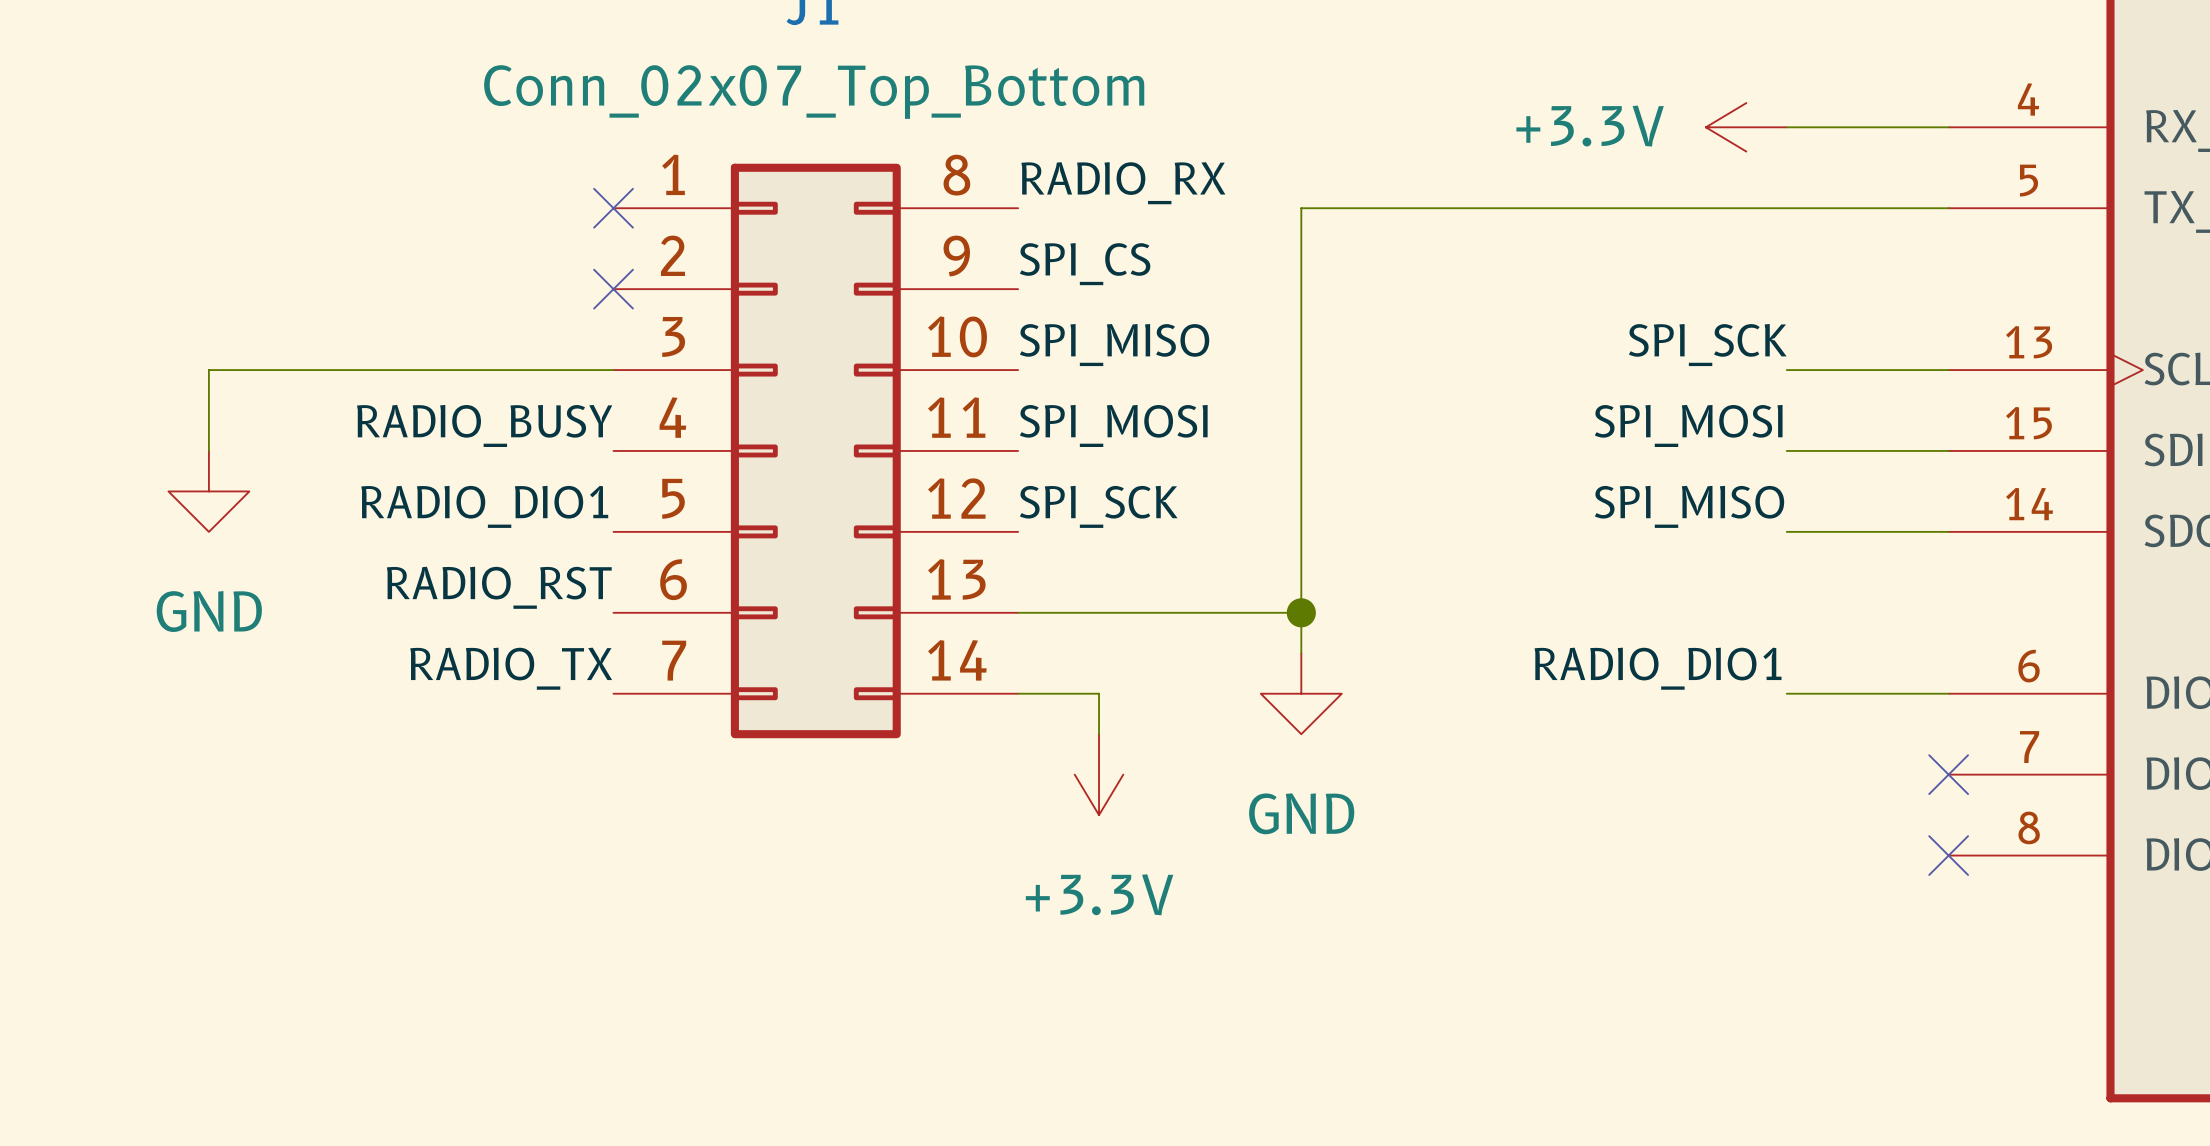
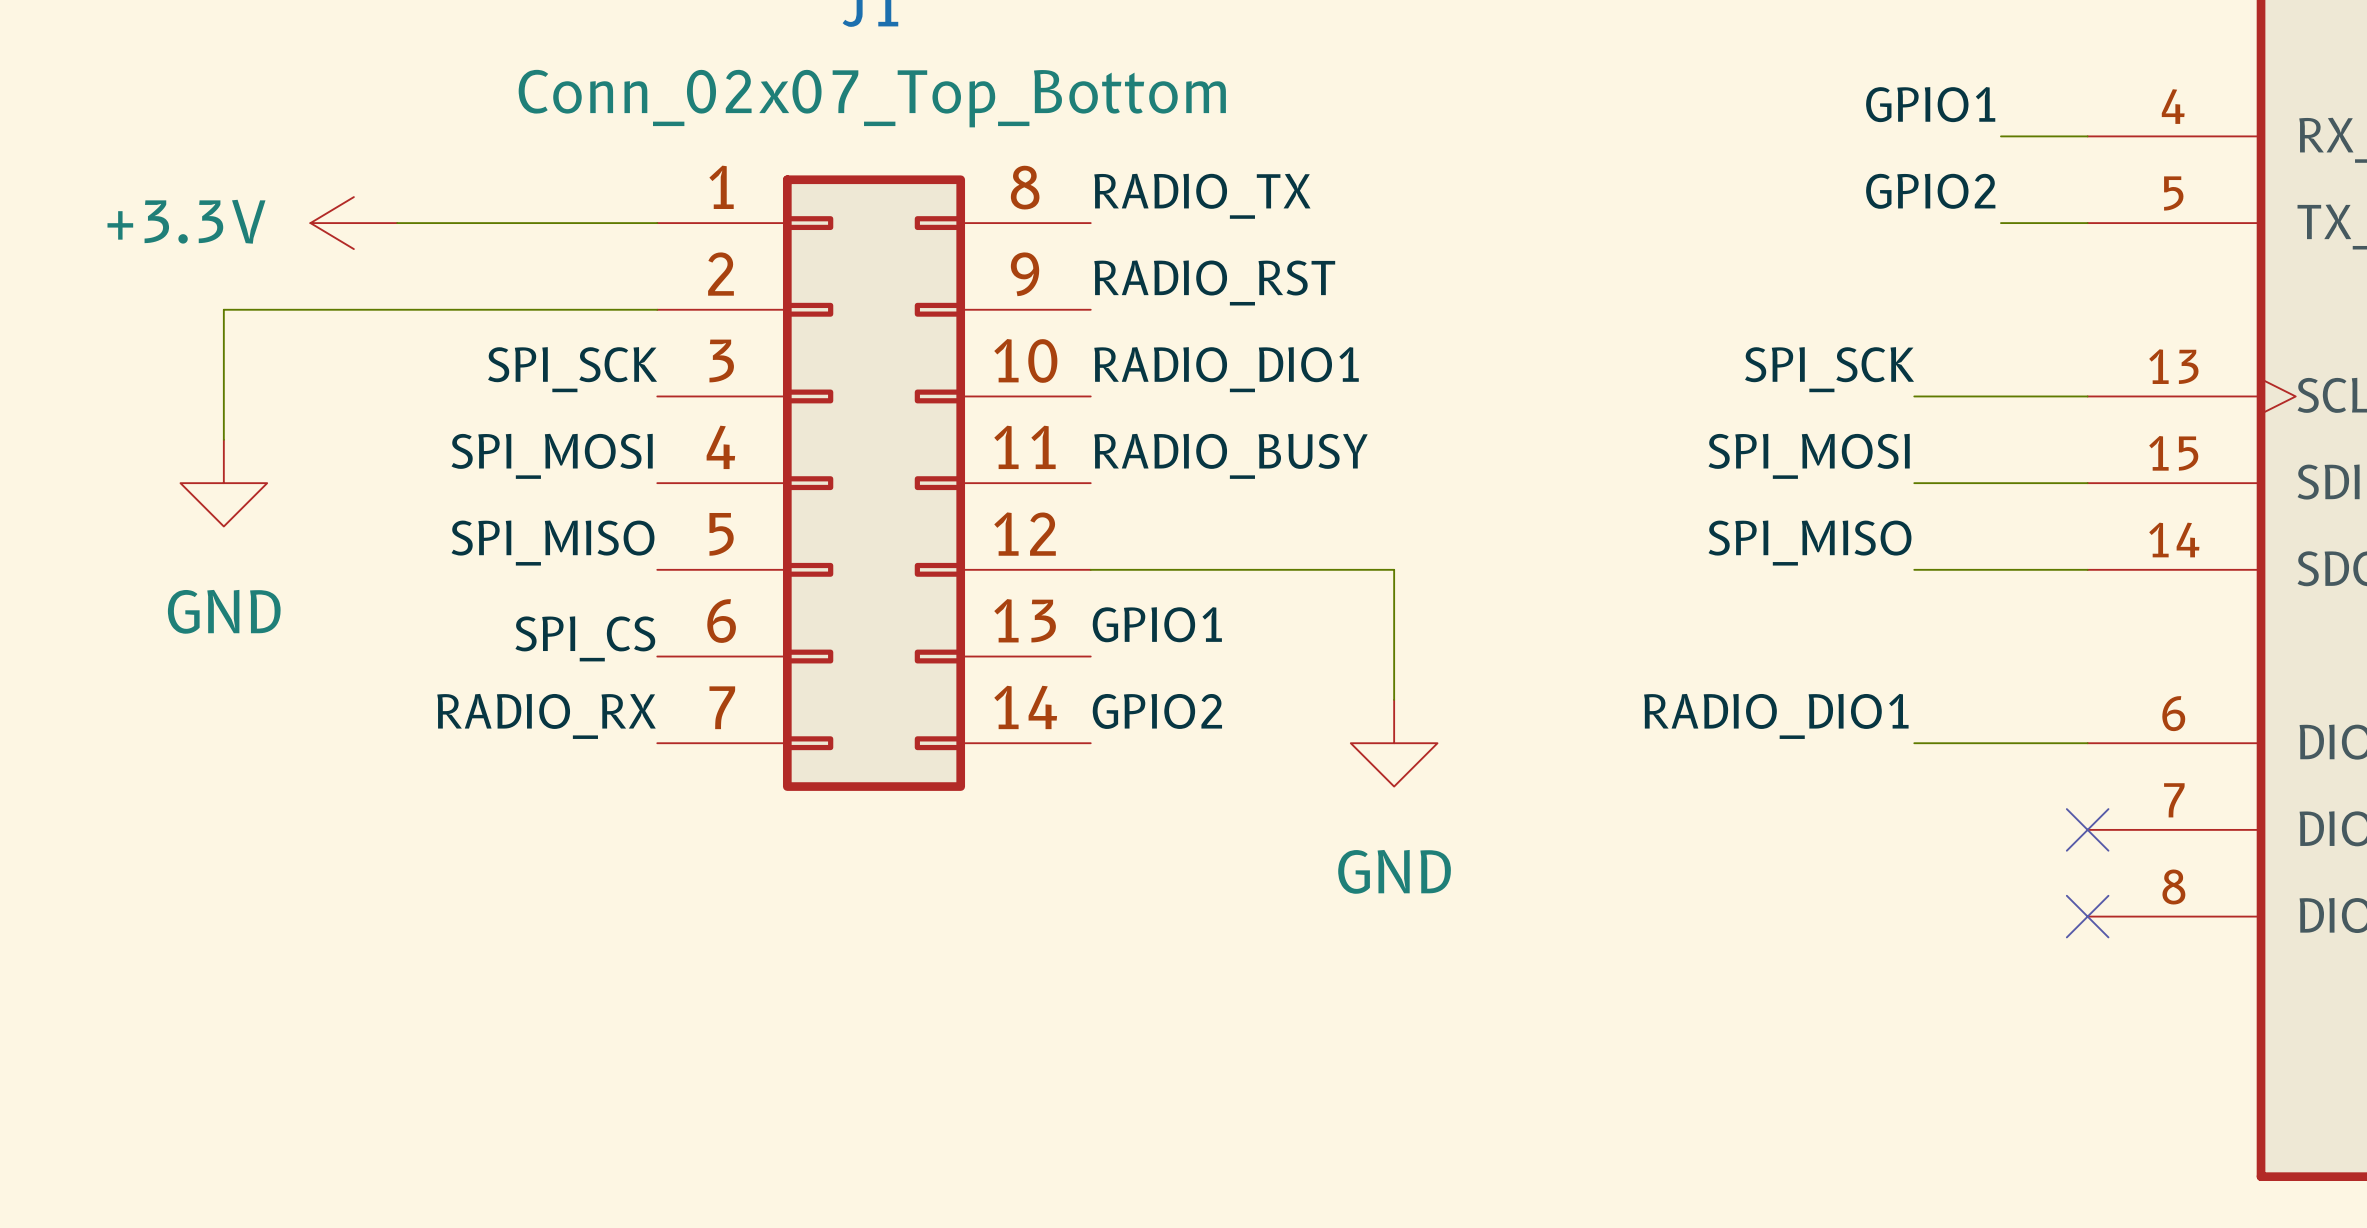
label: none -> GPIO1 (1930, 104)
power symbol: +3.3V (1746, 127) -> none
wire: (1786, 127) (1867, 127) -> none
label: none -> GPIO2 (1930, 191)
label: RADIO_RX (1123, 183) -> RADIO_TX (1202, 196)
power symbol: none -> +3.3V (353, 223)
wire: none -> (397, 223) (657, 223)
no-connect mark: (613, 208) -> none
wire: (1867, 208) (1301, 208) (1301, 531) -> (1090, 569) (1394, 569)
label: SPI_CS (1085, 264) -> RADIO_RST (1214, 282)
no-connect mark: (613, 289) -> none
label: SPI_MISO (1114, 345) -> RADIO_DIO1 (1226, 369)
wire: (208, 370) (613, 370) -> (223, 396) (223, 309) (657, 309)
label: RADIO_BUSY (484, 425) -> SPI_MOSI (552, 456)
label: SPI_MOSI (1113, 425) -> RADIO_BUSY (1230, 456)
power symbol position: GND (208, 491) -> GND (223, 483)
label: RADIO_DIO1 (484, 506) -> SPI_MISO (553, 543)
label position: SPI_SCK (1098, 506) -> SPI_SCK (572, 369)
label: none -> GPIO1 (1157, 624)
label: RADIO_RST (499, 587) -> SPI_CS (585, 638)
wire: (1018, 612) (1301, 612) -> none
junction: (1301, 612) -> none
label: none -> GPIO2 (1157, 711)
label: RADIO_TX (511, 668) -> RADIO_RX (546, 716)
wire: (1018, 693) (1099, 693) (1099, 734) -> none
power symbol: +3.3V (1099, 774) -> none

